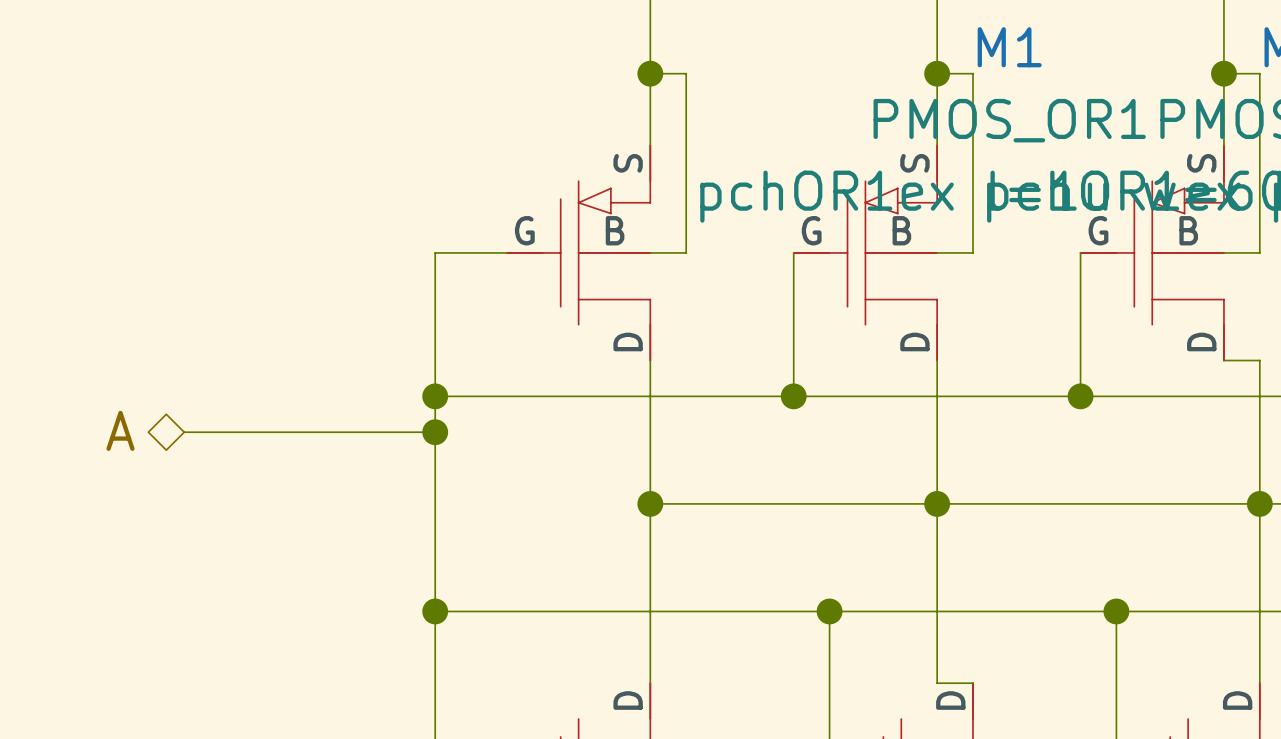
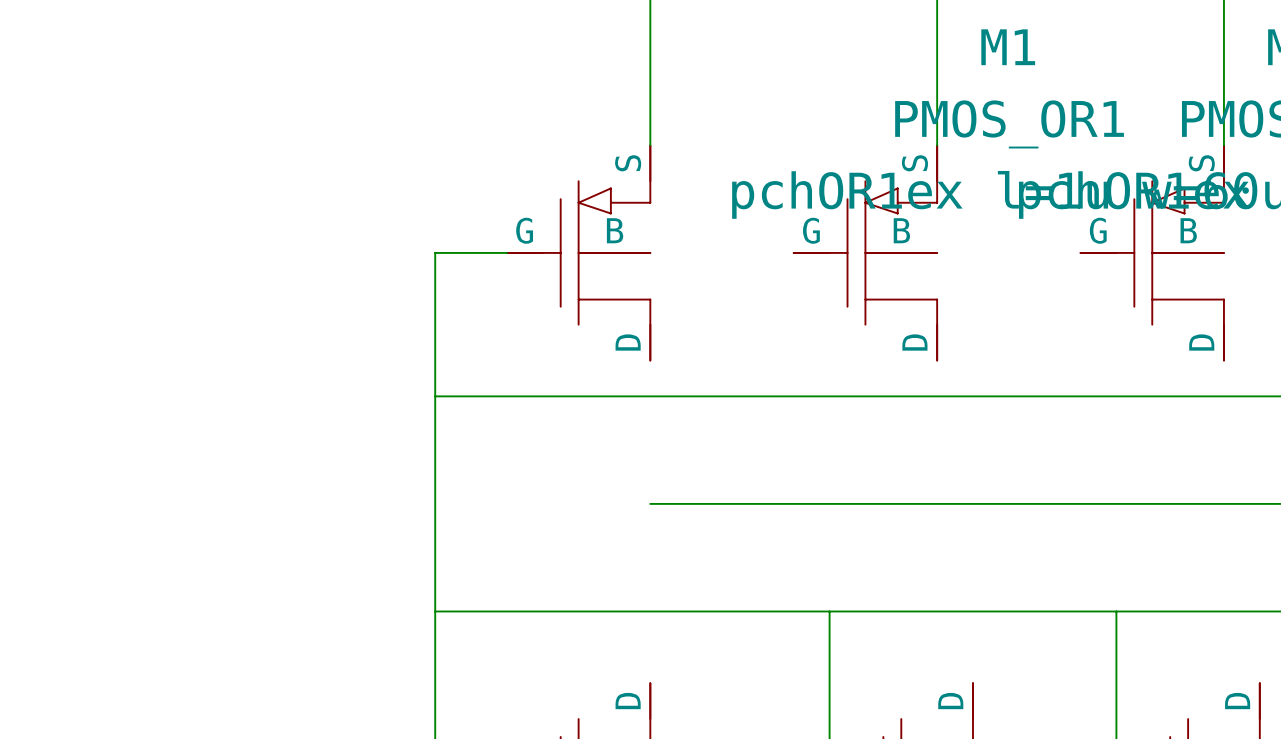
wire: (650, 73) (686, 73) (686, 252) (650, 252) -> none
junction: (650, 73) -> none
wire: (937, 73) (973, 73) (973, 252) (937, 252) -> none
junction: (937, 73) -> none
wire: (1223, 73) (1259, 73) (1259, 252) (1223, 252) -> none
junction: (1223, 73) -> none
wire: (793, 252) (793, 396) -> none
wire: (1080, 252) (1080, 396) -> none
wire: (650, 360) (650, 683) -> none
wire: (937, 360) (937, 683) (973, 683) -> none
wire: (1223, 360) (1259, 360) (1259, 683) -> none
junction: (435, 396) -> none
junction: (793, 396) -> none
junction: (1080, 396) -> none
hierarchical label: A (120, 430) -> none
wire: (184, 432) (435, 432) -> none
junction: (435, 432) -> none
junction: (650, 503) -> none
junction: (937, 503) -> none
junction: (1259, 503) -> none
junction: (435, 611) -> none
junction: (829, 611) -> none
junction: (1116, 611) -> none

